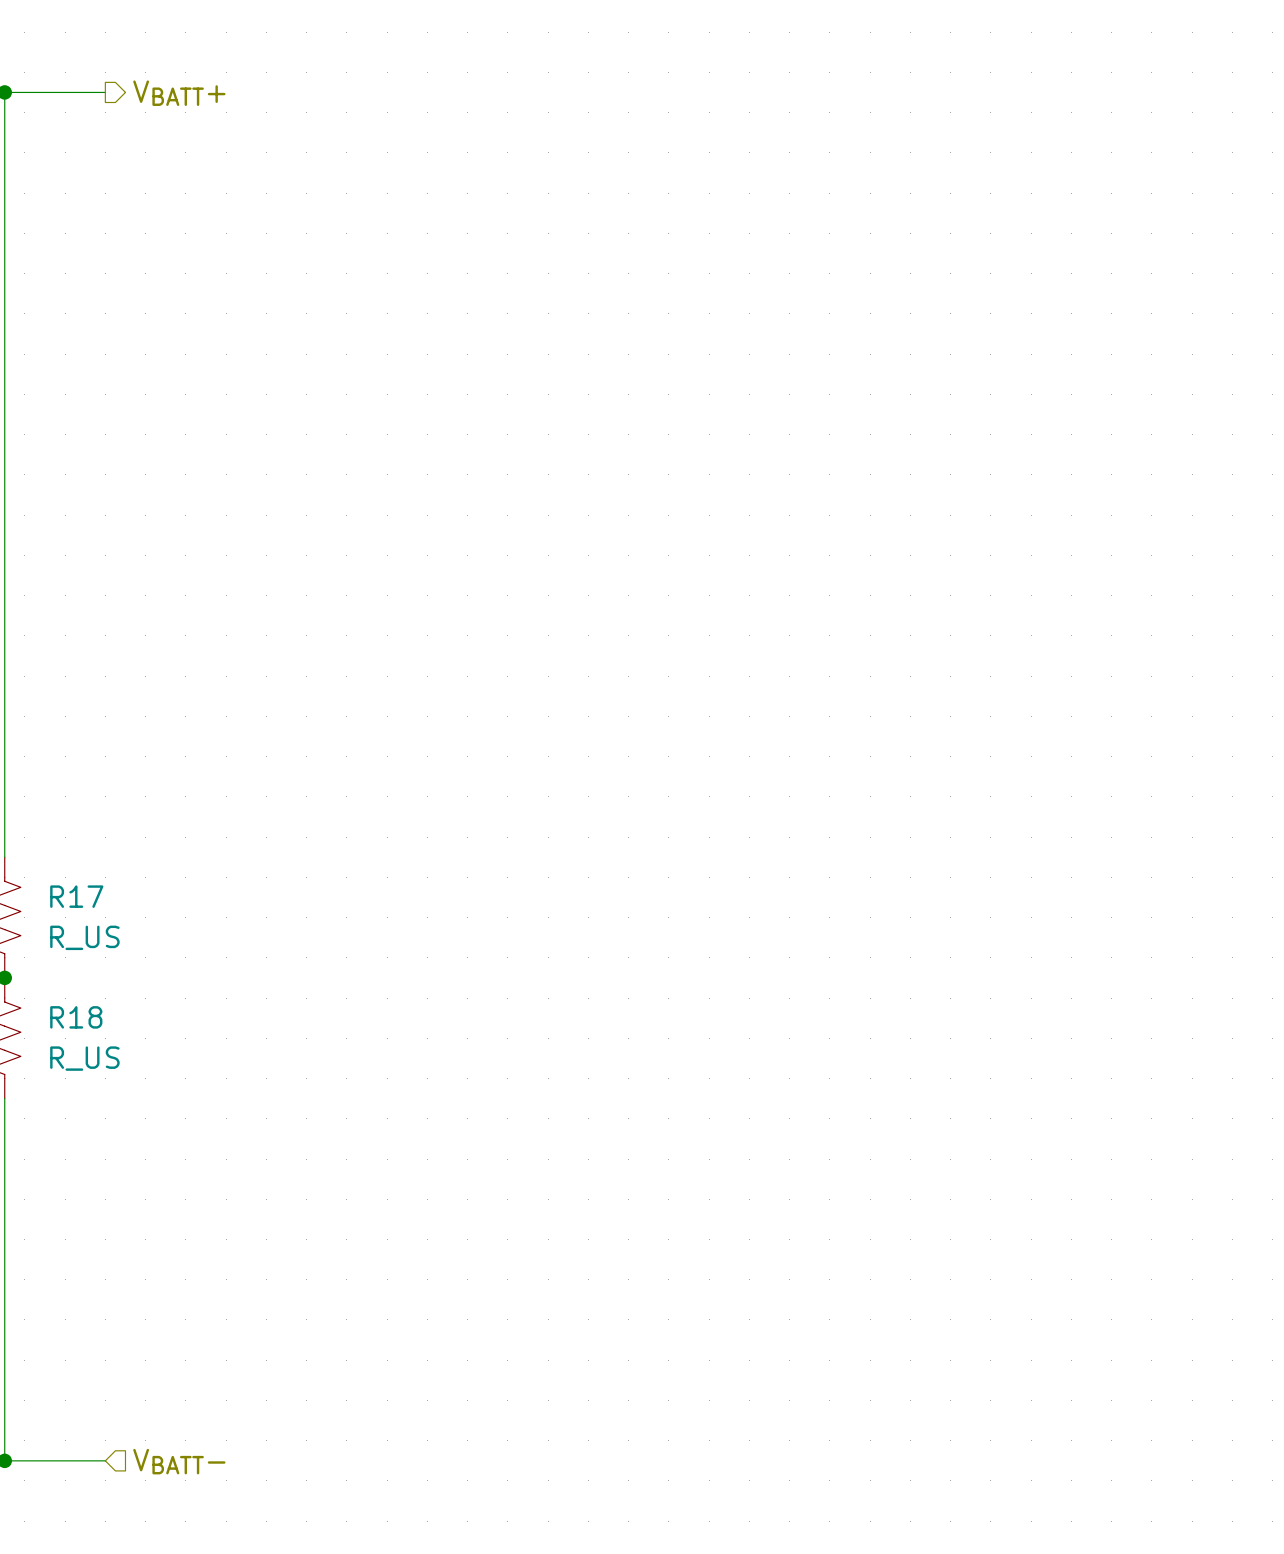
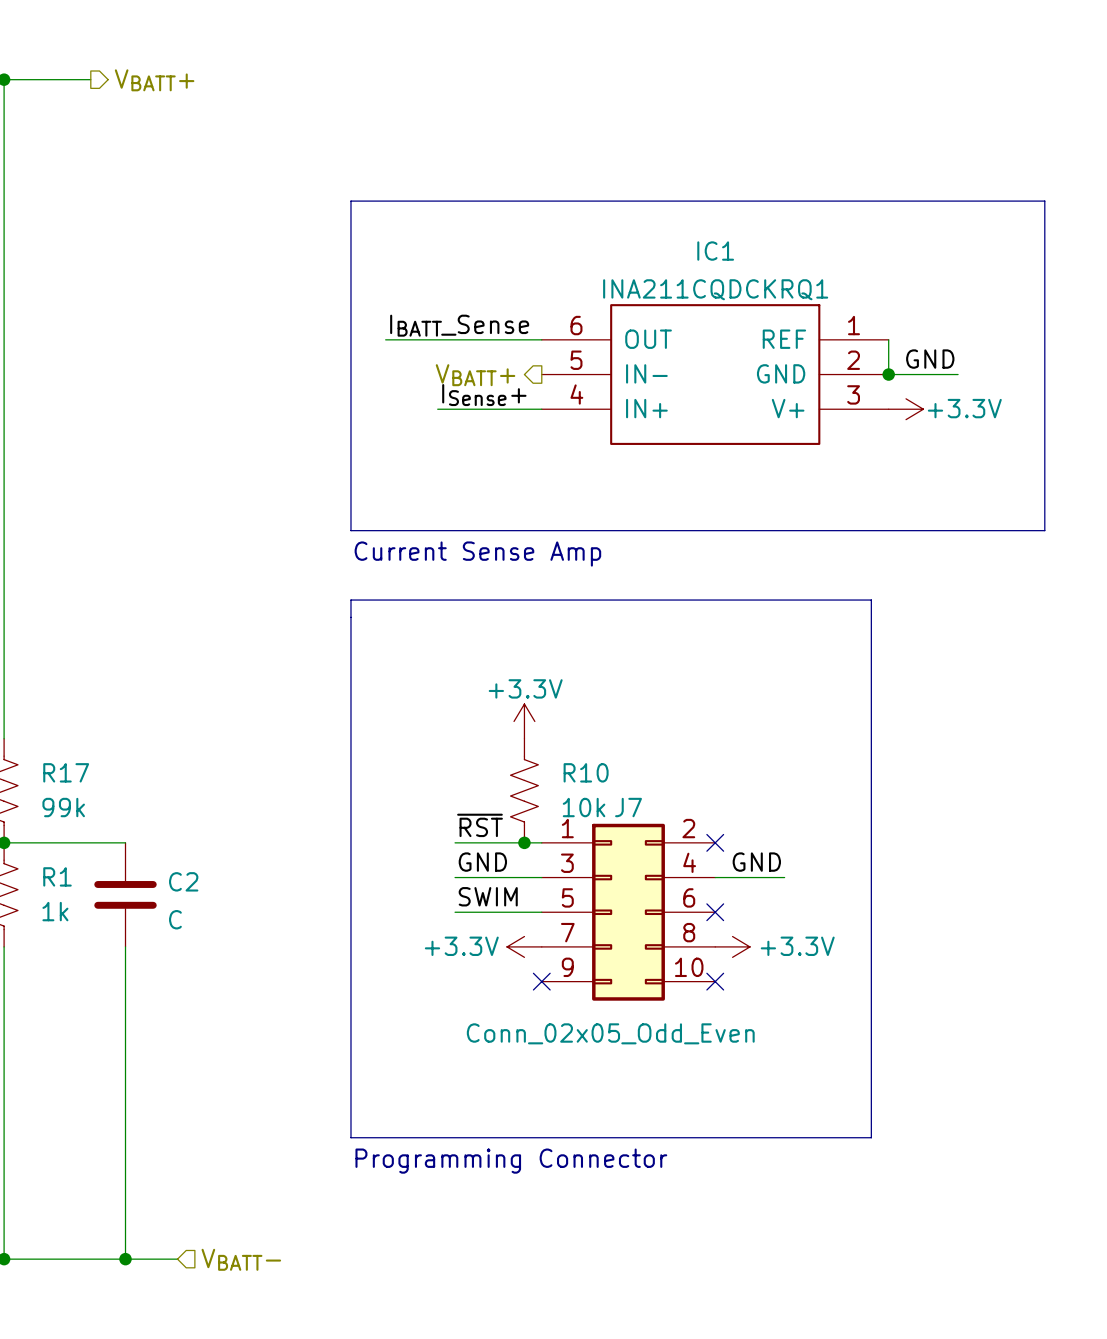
line: none -> (350, 201) (1044, 201) (1044, 530) (350, 530) (350, 201)
label: none -> IBATT_Sense (459, 325)
wire: none -> (385, 339) (541, 339)
wire: none -> (888, 339) (888, 374) (958, 374)
label: none -> GND (930, 359)
IC1: none -> INA211CQDCKRQ1 (715, 374)
junction: none -> (888, 374)
hierarchical label: none -> VBATT+ (475, 375)
label: none -> ISense+ (484, 395)
wire: none -> (437, 409) (541, 409)
power symbol: none -> +3.3V (906, 409)
text: none -> Current Sense Amp (477, 554)
line: none -> (350, 600) (350, 1137) (871, 1137) (871, 600) (350, 600)
power symbol: none -> +3.3V (524, 721)
R10: none -> 10k (524, 790)
R17 value: R_US (84, 937) -> 99k (63, 807)
label: none -> ~{RST} (480, 825)
wire: none -> (4, 842) (125, 842)
wire: none -> (455, 842) (541, 842)
junction: none -> (524, 842)
no-connect mark: none -> (715, 842)
label: none -> GND (482, 862)
label: none -> GND (756, 862)
R18 name: R18 (76, 1017) -> R1 (57, 876)
wire: none -> (455, 877) (541, 877)
wire: none -> (715, 877) (784, 877)
C2: none -> C (125, 894)
label: none -> SWIM (488, 896)
R18 value: R_US (84, 1058) -> 1k (55, 911)
wire: none -> (455, 912) (541, 912)
J7: none -> Conn_02x05_Odd_Even (628, 912)
no-connect mark: none -> (715, 912)
wire: none -> (125, 946) (125, 1259)
power symbol: none -> +3.3V (524, 946)
power symbol: none -> +3.3V (732, 946)
no-connect mark: none -> (541, 981)
no-connect mark: none -> (715, 981)
text: none -> Programming Connector (511, 1161)
wire: none -> (90, 1259) (177, 1259)
junction: none -> (125, 1259)
hierarchical label position: VBATT- (179, 1461) -> VBATT- (241, 1259)

